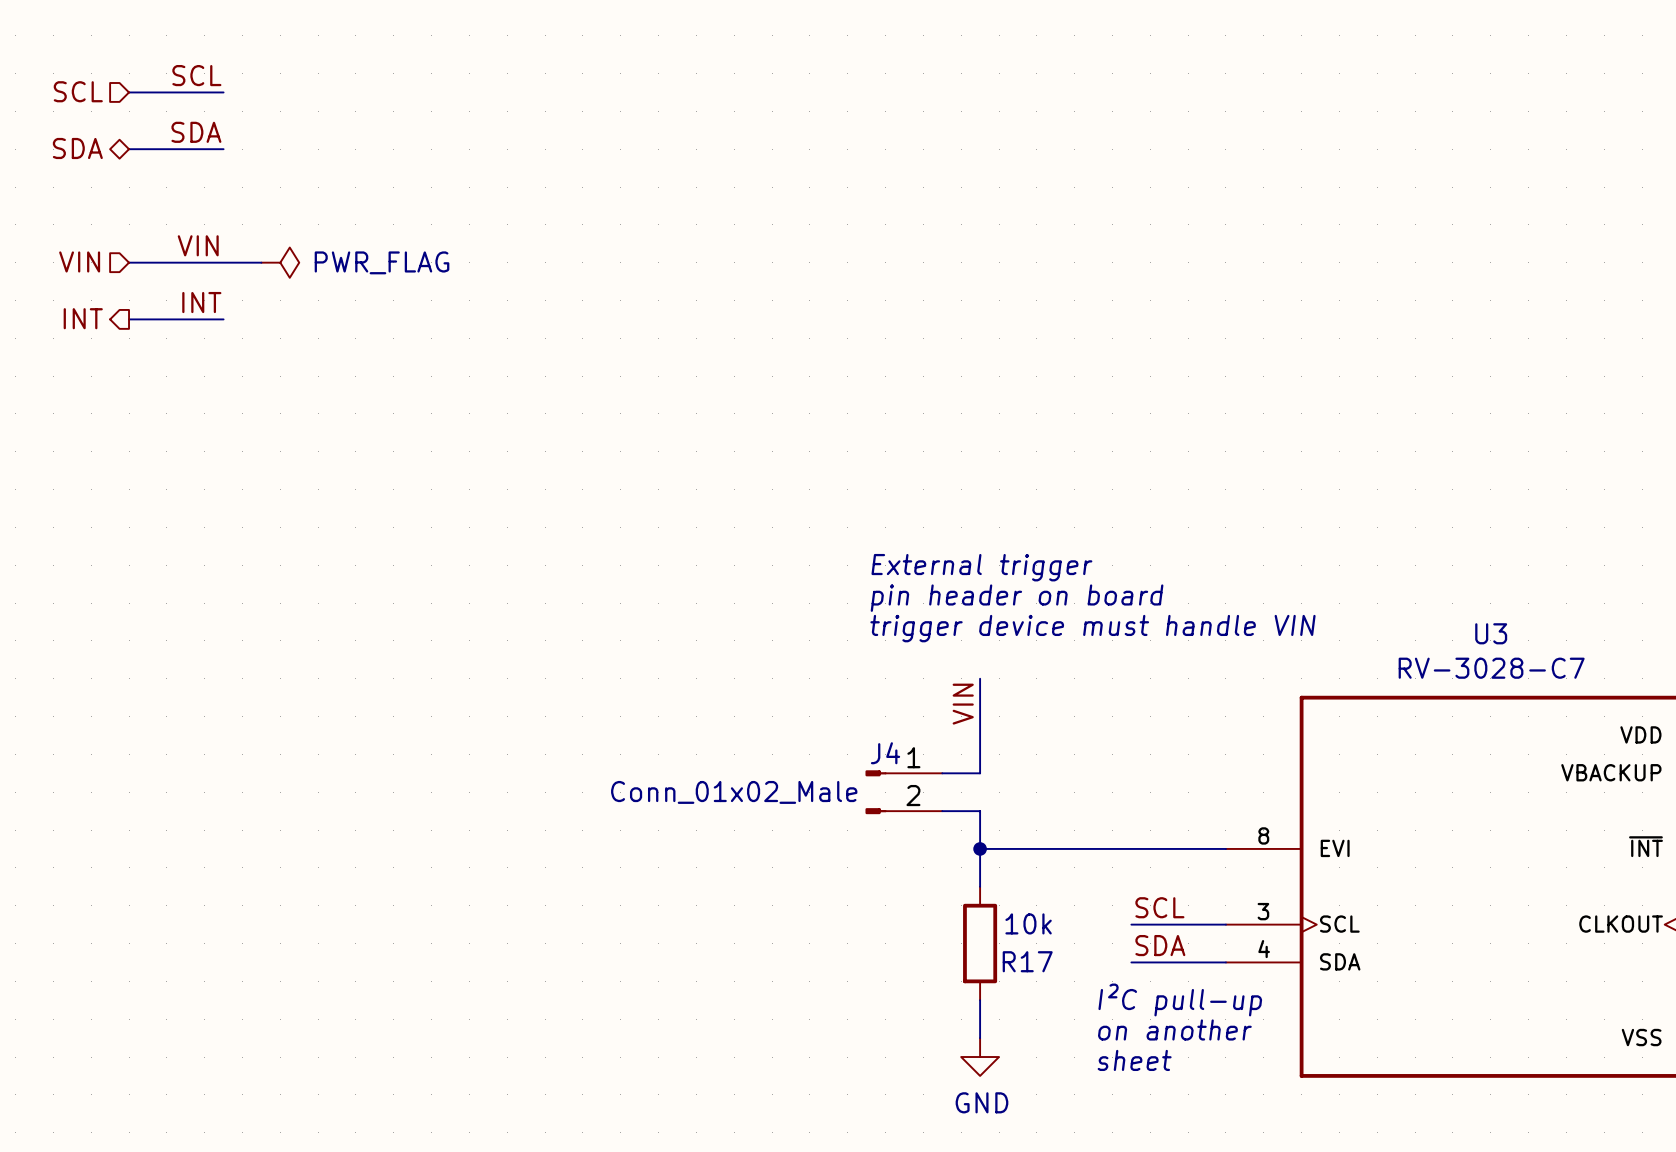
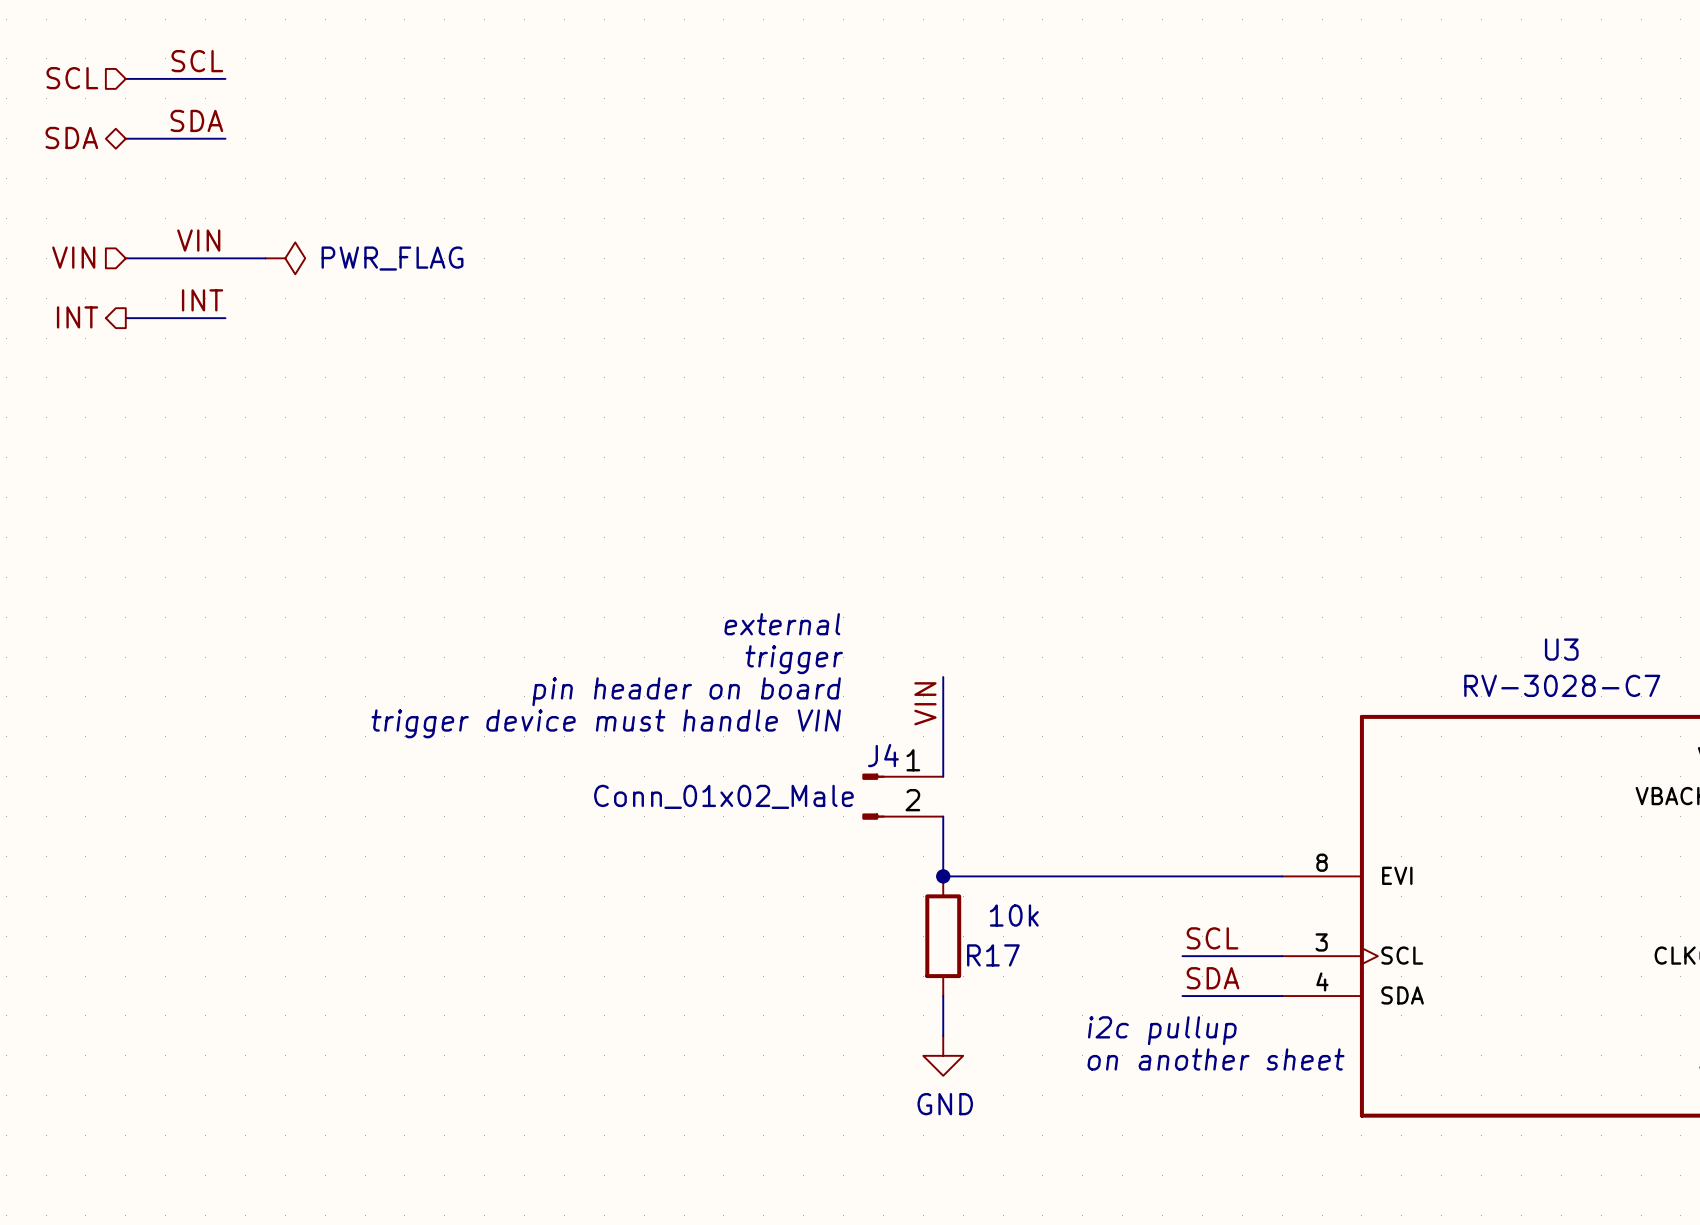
text: External trigger (981, 567) -> none
text position: pin header on board (1017, 598) -> pin header on board (686, 691)
text: none -> external (782, 624)
text position: trigger device must handle VIN (1092, 628) -> trigger device must handle VIN (606, 723)
text: none -> trigger (794, 659)
wire: none -> (943, 677) (943, 776)
wire: (980, 678) (980, 773) (942, 773) -> none
label position: VIN (963, 704) -> VIN (925, 703)
J4 position: (903, 792) -> (902, 796)
wire: none -> (943, 816) (943, 876) (1022, 876)
wire: (942, 811) (980, 811) (980, 886) -> none
junction position: (980, 848) -> (943, 876)
R17 value position: 10k (1028, 923) -> 10k (1014, 915)
R17 position: (980, 943) -> (943, 936)
text: I²C pull-up (1180, 999) -> i2c pullup (1162, 1030)
wire: (980, 1000) (980, 1038) -> (943, 996) (943, 1035)
text: on another (1174, 1029) -> on another sheet (1215, 1059)
power symbol position: GND (980, 1057) -> GND (943, 1055)
text: sheet (1134, 1060) -> none

